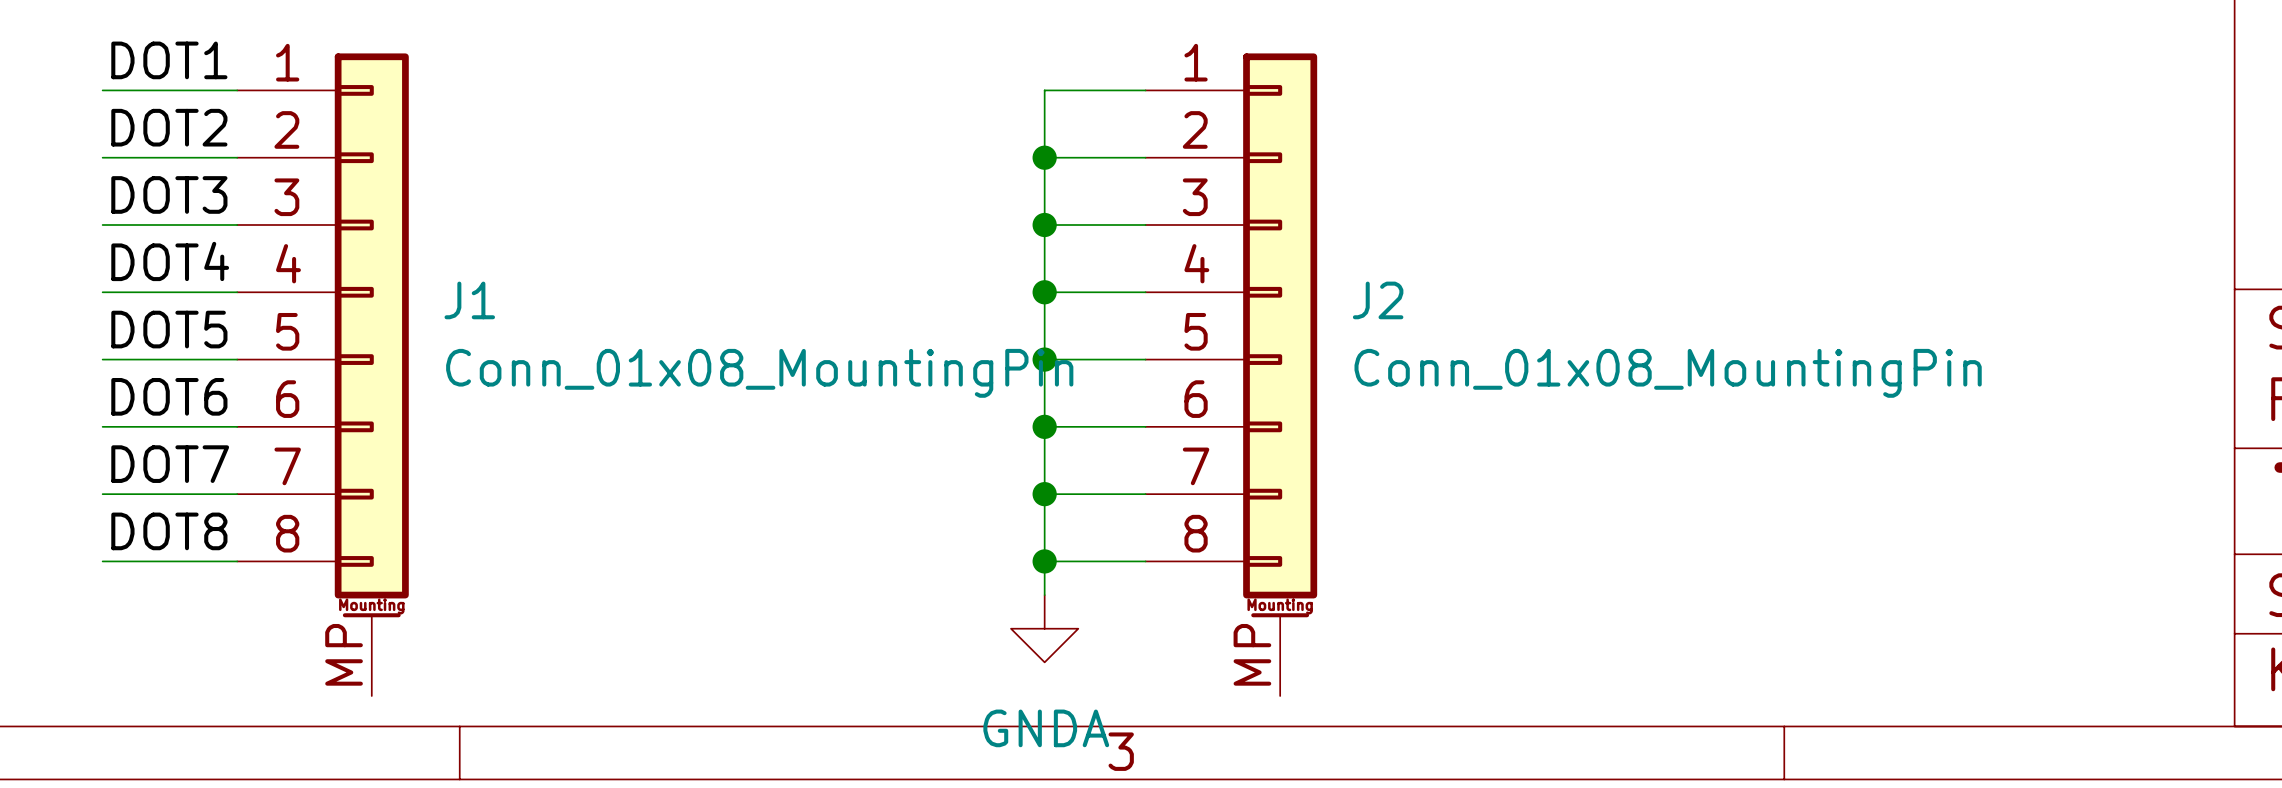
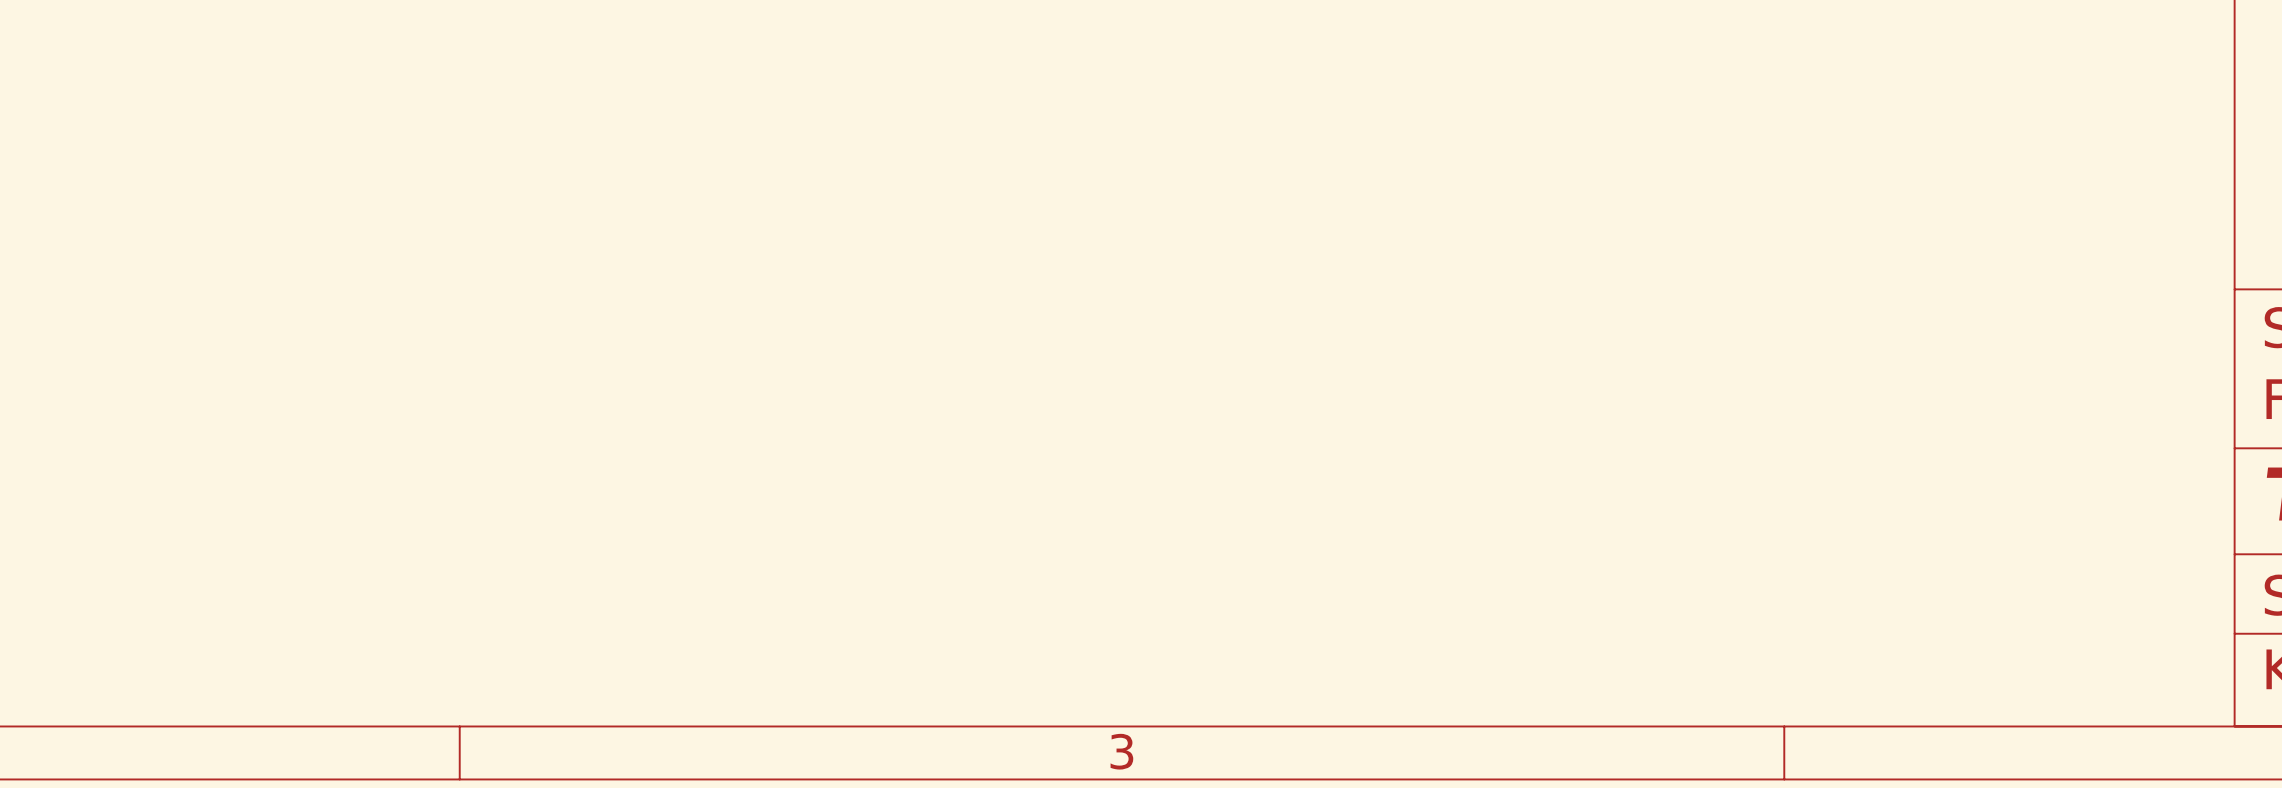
label: DOT1 (169, 60) -> none
wire: (102, 90) (237, 90) -> none
wire: (1145, 90) (1044, 90) (1044, 595) -> none
label: DOT2 (169, 127) -> none
wire: (102, 157) (237, 157) -> none
wire: (1044, 157) (1145, 157) -> none
junction: (1044, 157) -> none
label: DOT3 (169, 194) -> none
wire: (102, 224) (237, 224) -> none
wire: (1044, 224) (1145, 224) -> none
junction: (1044, 224) -> none
label: DOT4 (170, 261) -> none
wire: (102, 292) (237, 292) -> none
wire: (1044, 292) (1145, 292) -> none
junction: (1044, 292) -> none
label: DOT5 (169, 329) -> none
wire: (102, 359) (237, 359) -> none
wire: (1044, 359) (1145, 359) -> none
junction: (1044, 359) -> none
J1: Conn_01x08_MountingPin (323, 374) -> none
J2: Conn_01x08_MountingPin (1231, 374) -> none
label: DOT6 (169, 396) -> none
wire: (102, 426) (237, 426) -> none
wire: (1044, 426) (1145, 426) -> none
junction: (1044, 426) -> none
label: DOT7 (170, 464) -> none
wire: (102, 494) (237, 494) -> none
wire: (1044, 494) (1145, 494) -> none
junction: (1044, 494) -> none
label: DOT8 (169, 531) -> none
wire: (102, 561) (237, 561) -> none
wire: (1044, 561) (1145, 561) -> none
junction: (1044, 561) -> none
power symbol: GNDA (1044, 628) -> none

